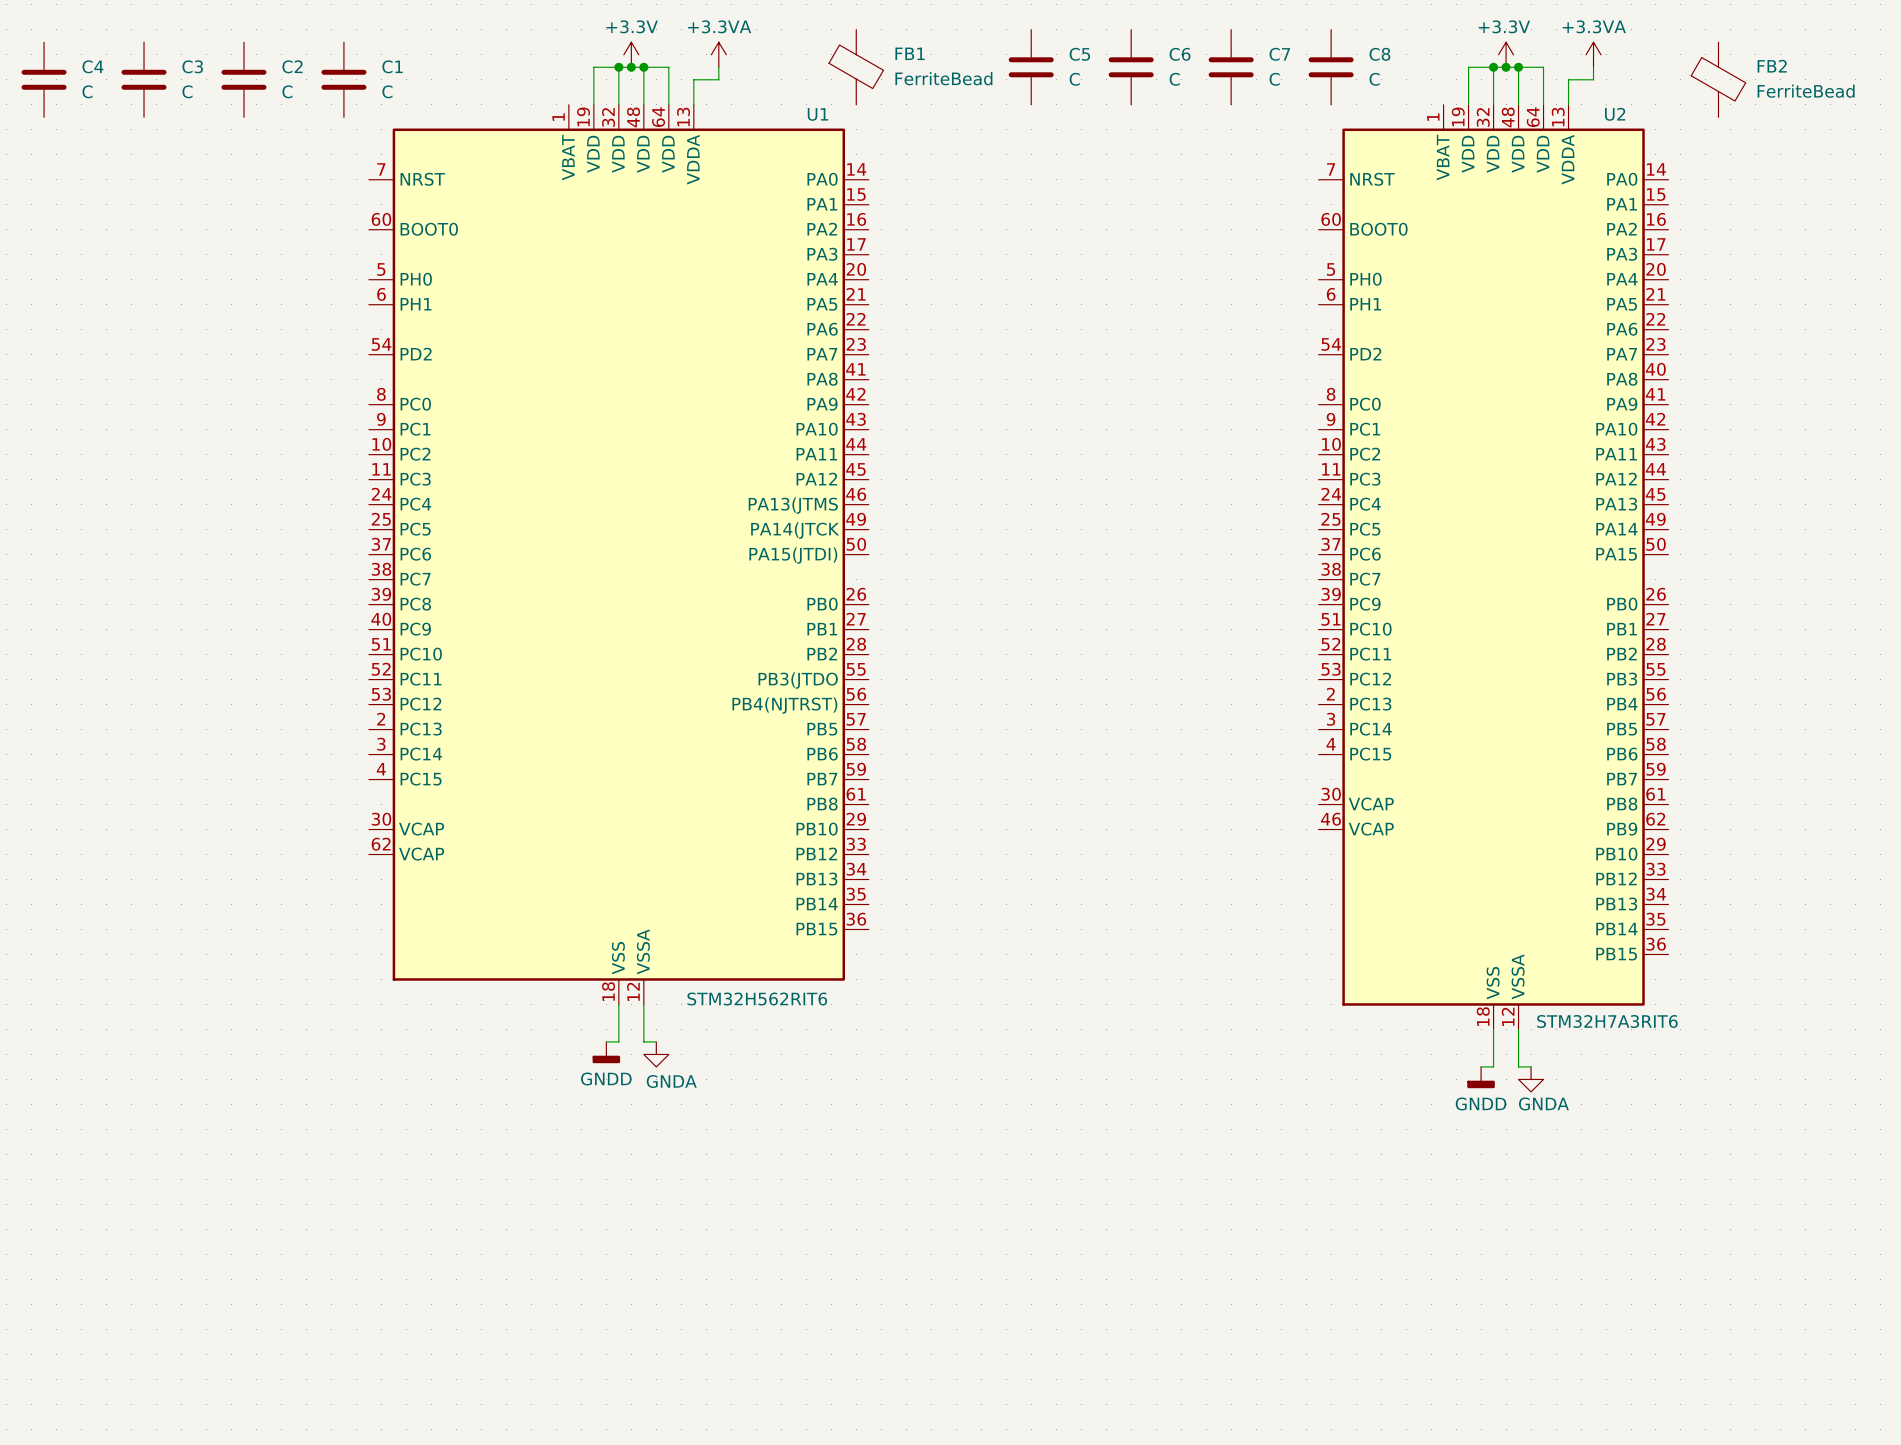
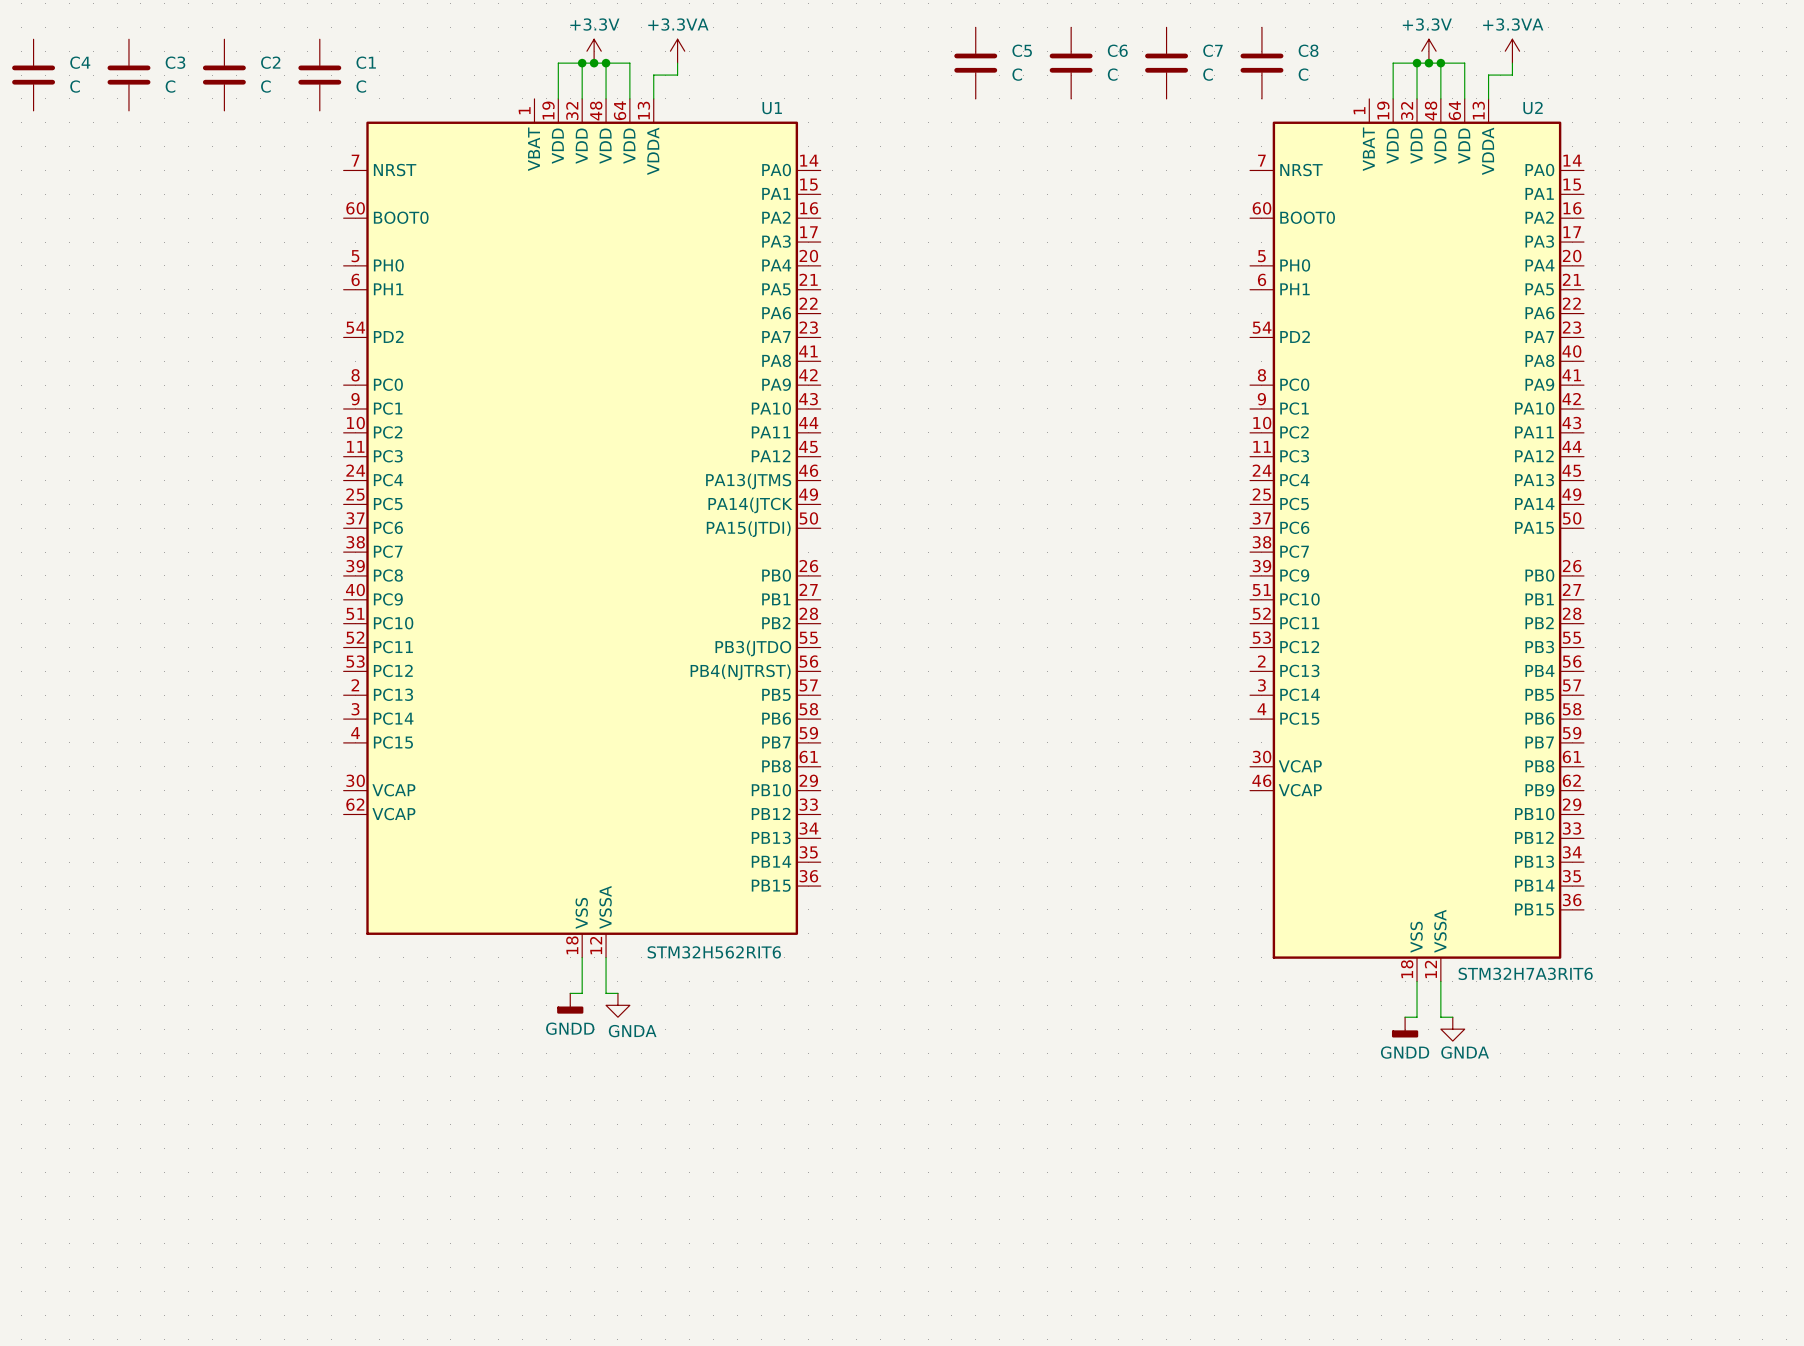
FB1: FerriteBead (856, 67) -> none
FB2: FerriteBead (1718, 79) -> none

